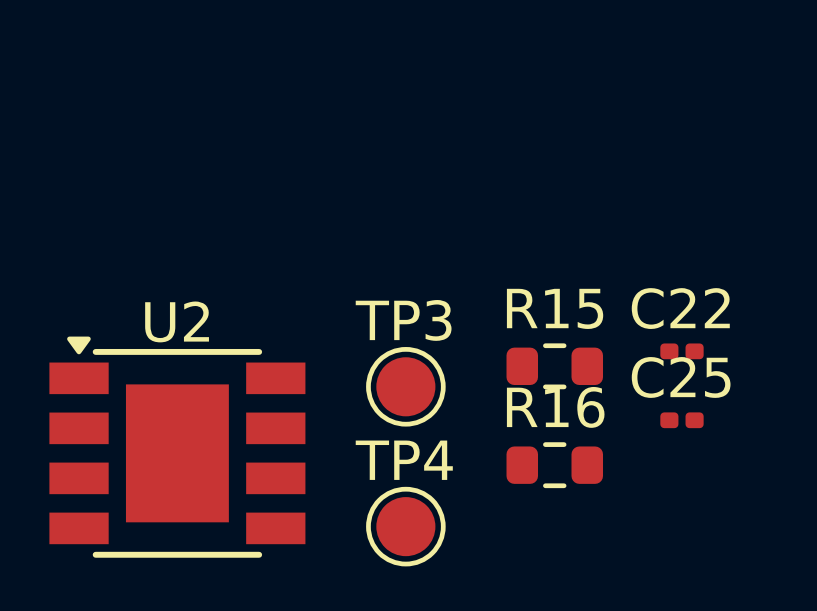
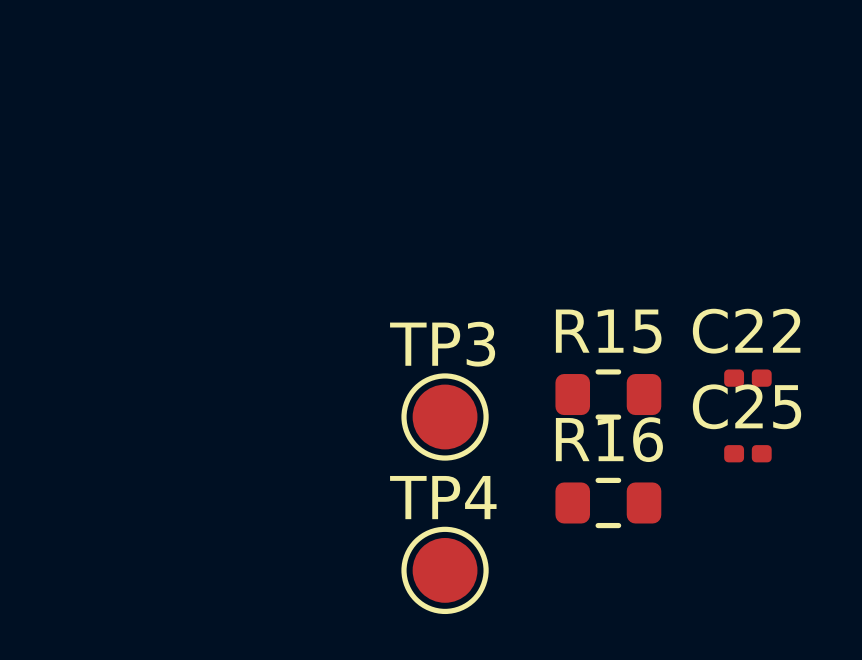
U2: (177, 447) -> none

